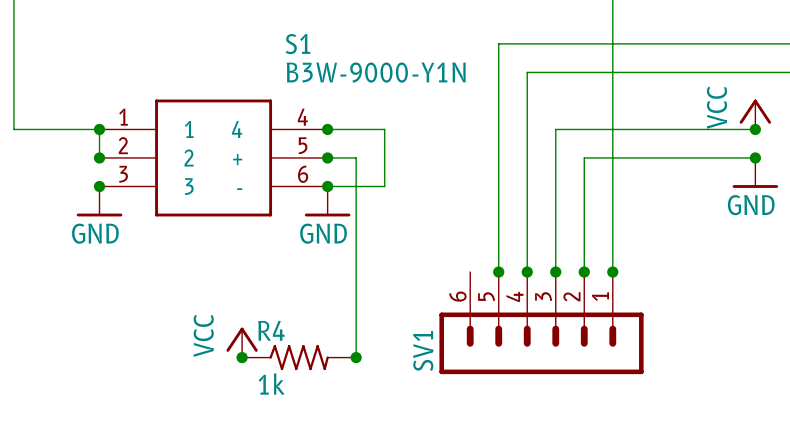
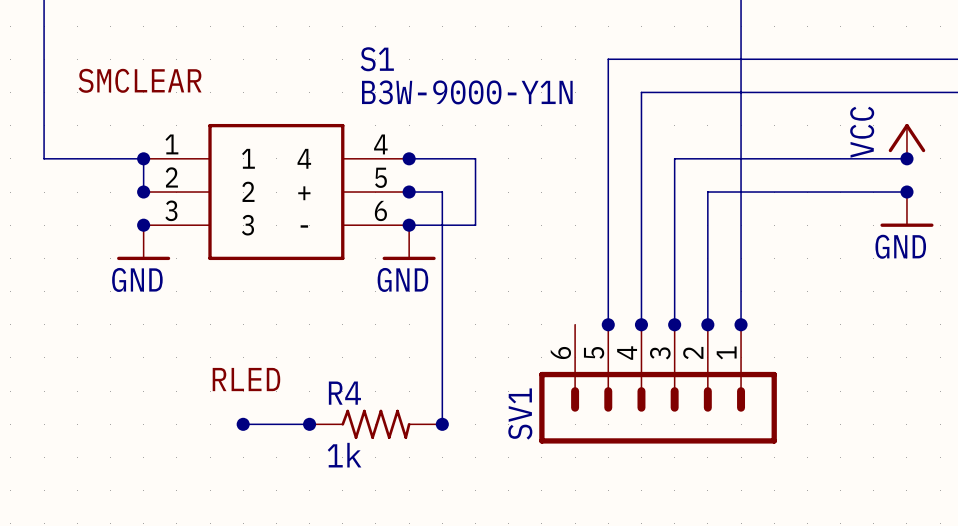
label: none -> SMCLEAR (140, 80)
label: none -> RLED (246, 379)
power symbol: VCC (242, 342) -> none
wire: none -> (243, 424) (309, 424)
junction: none -> (243, 424)

